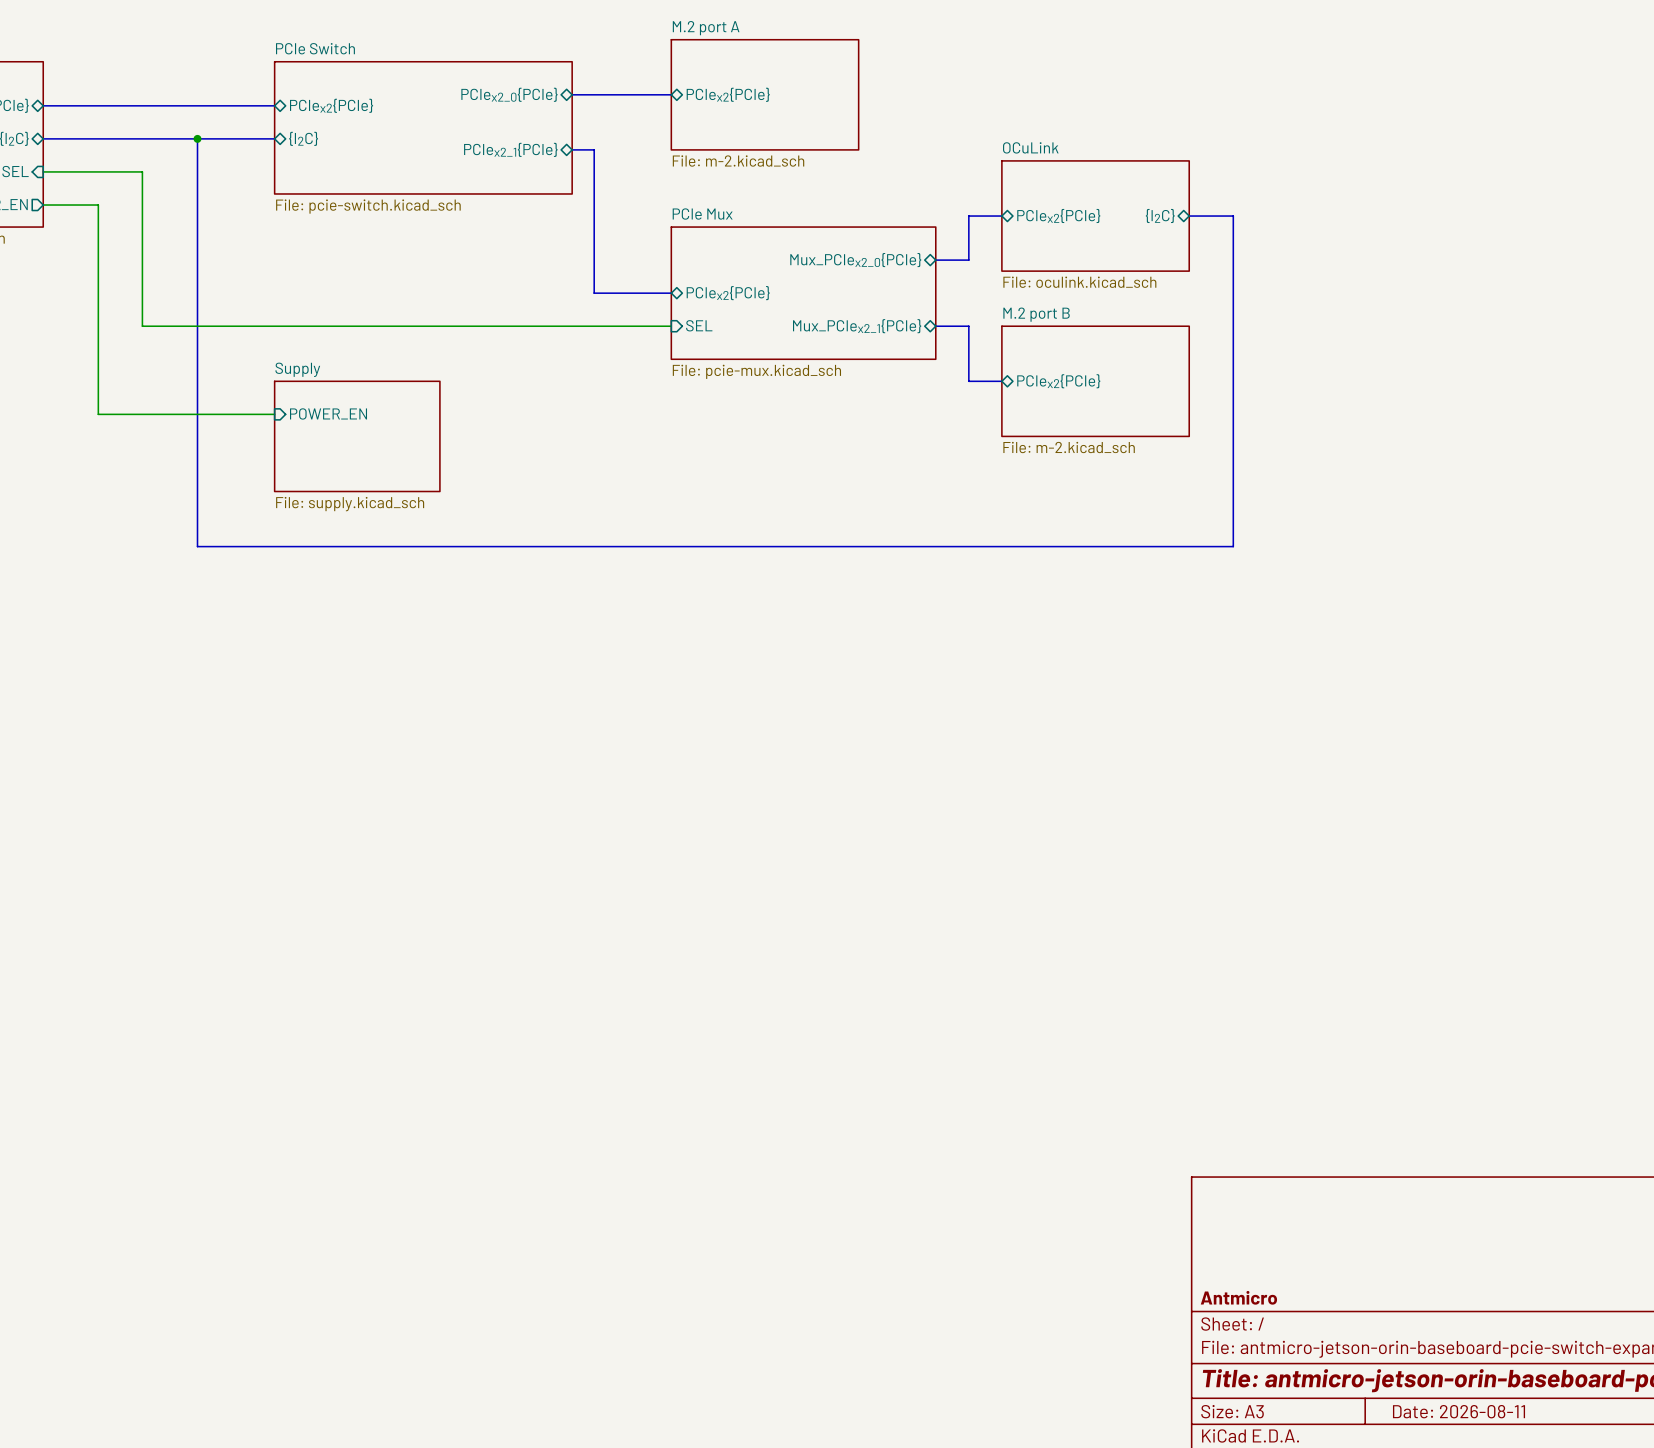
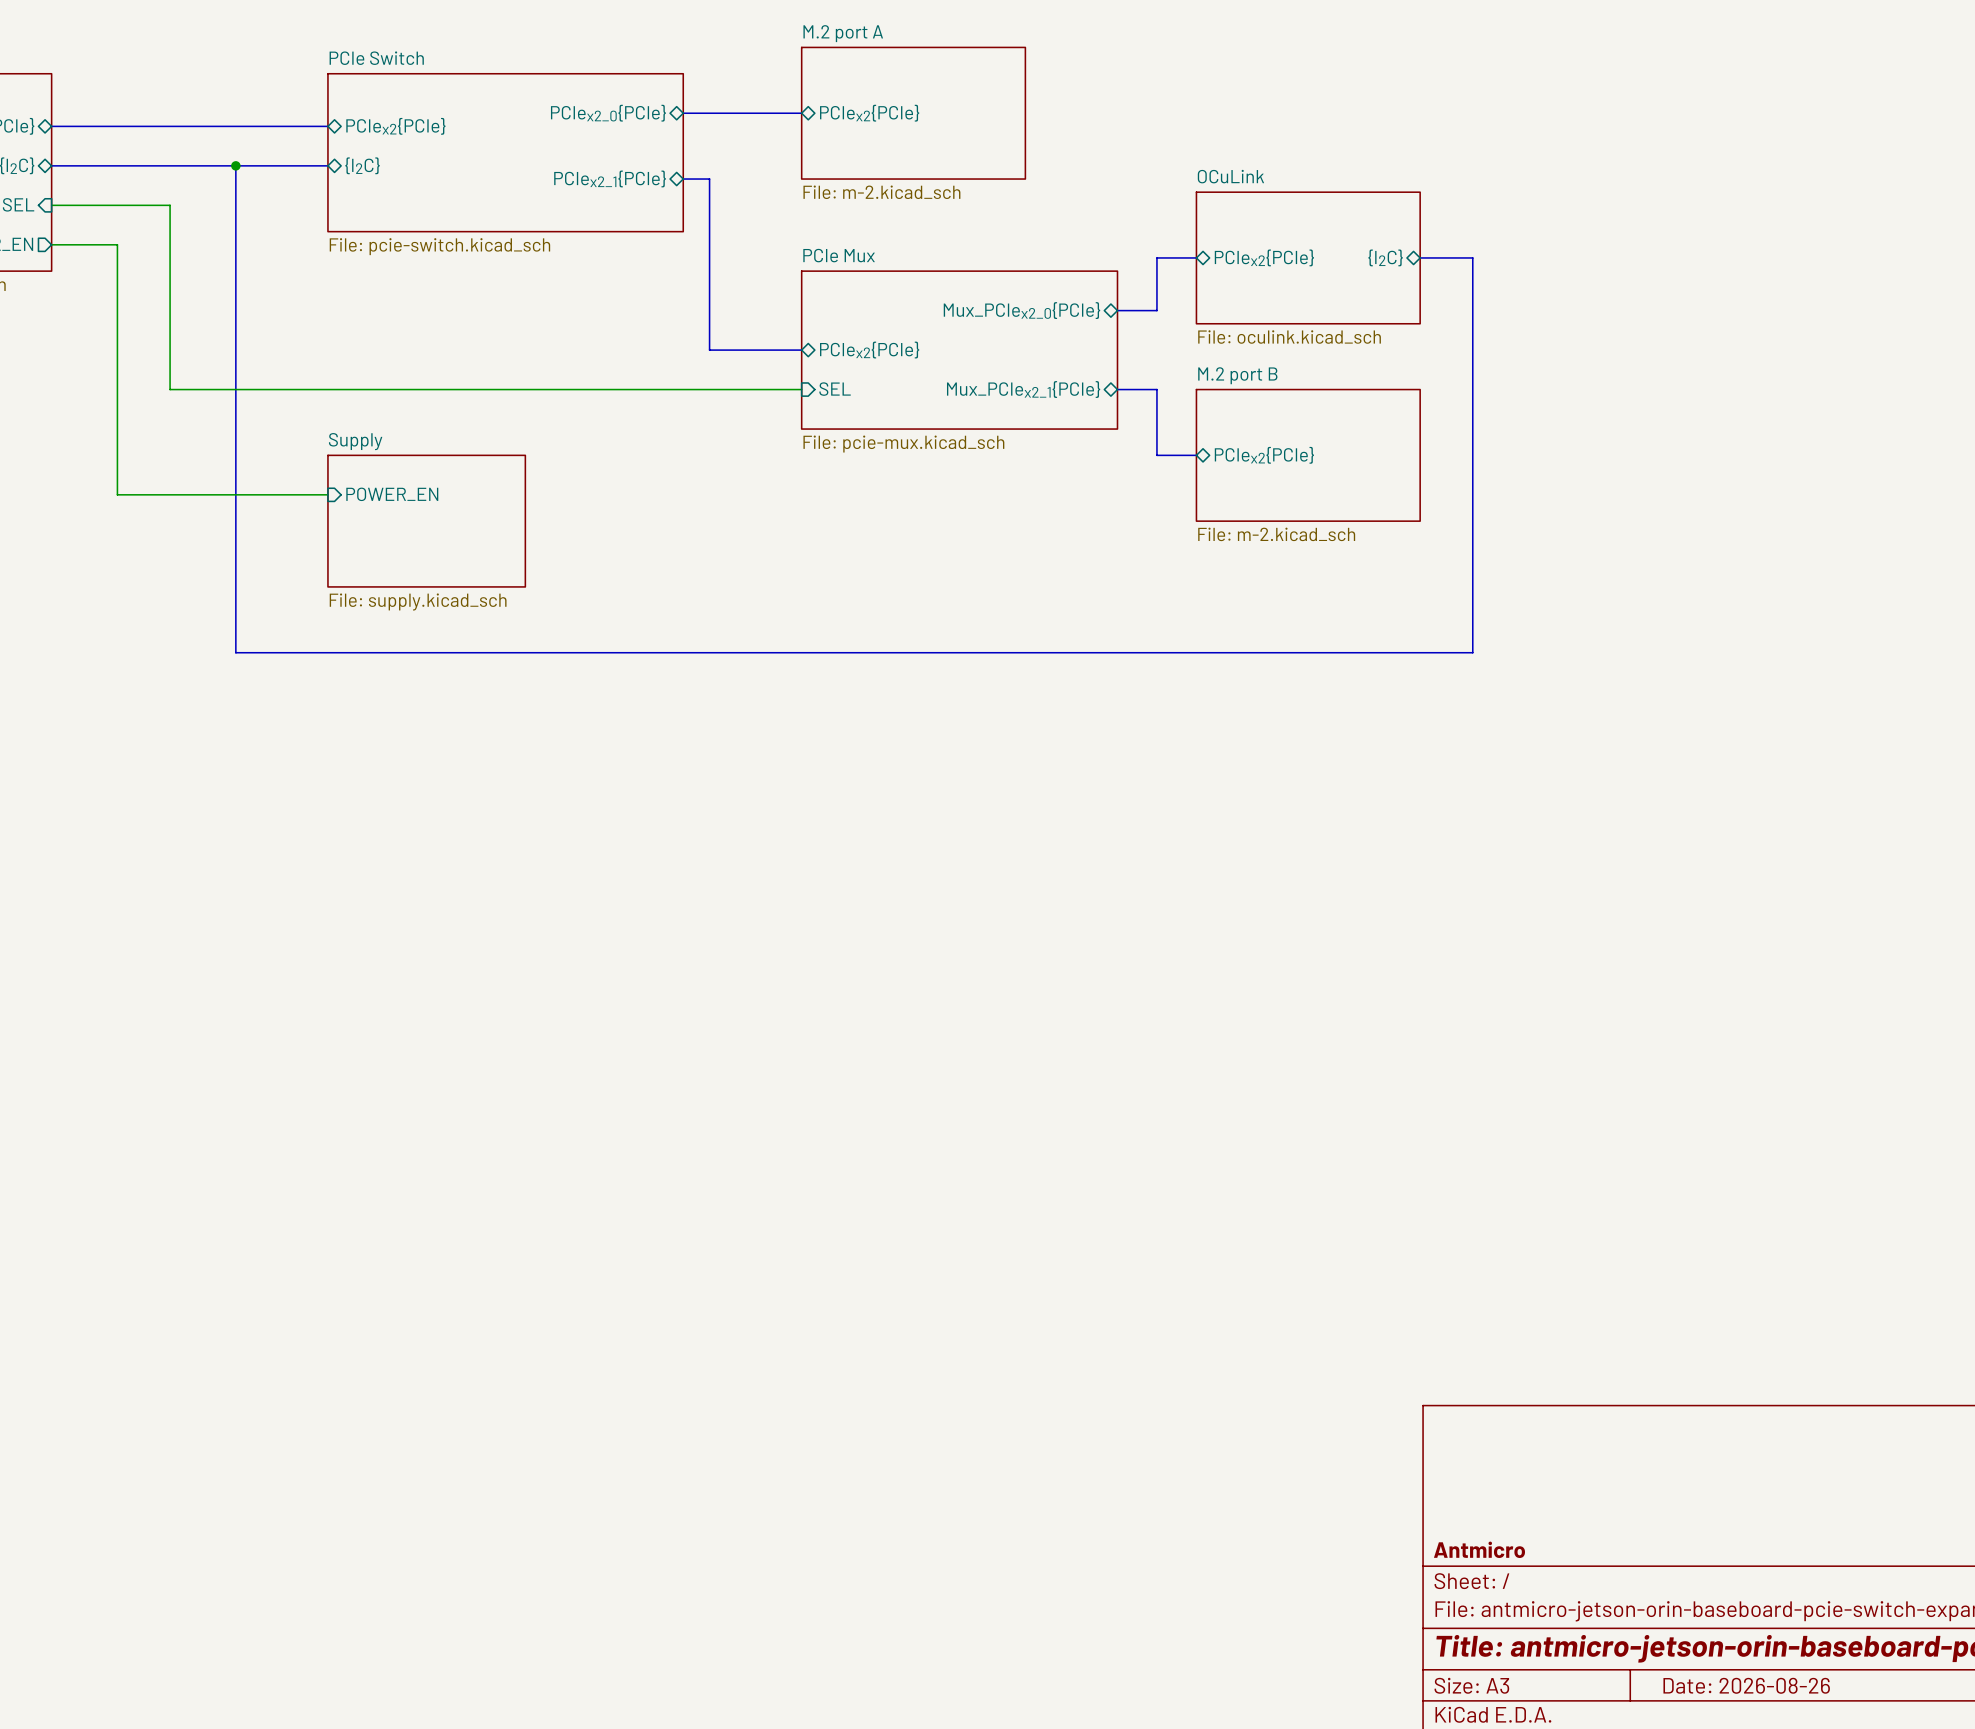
title block: Date: 2026-08-11 (1459, 1411) -> Date: 2026-08-26 (1746, 1685)

